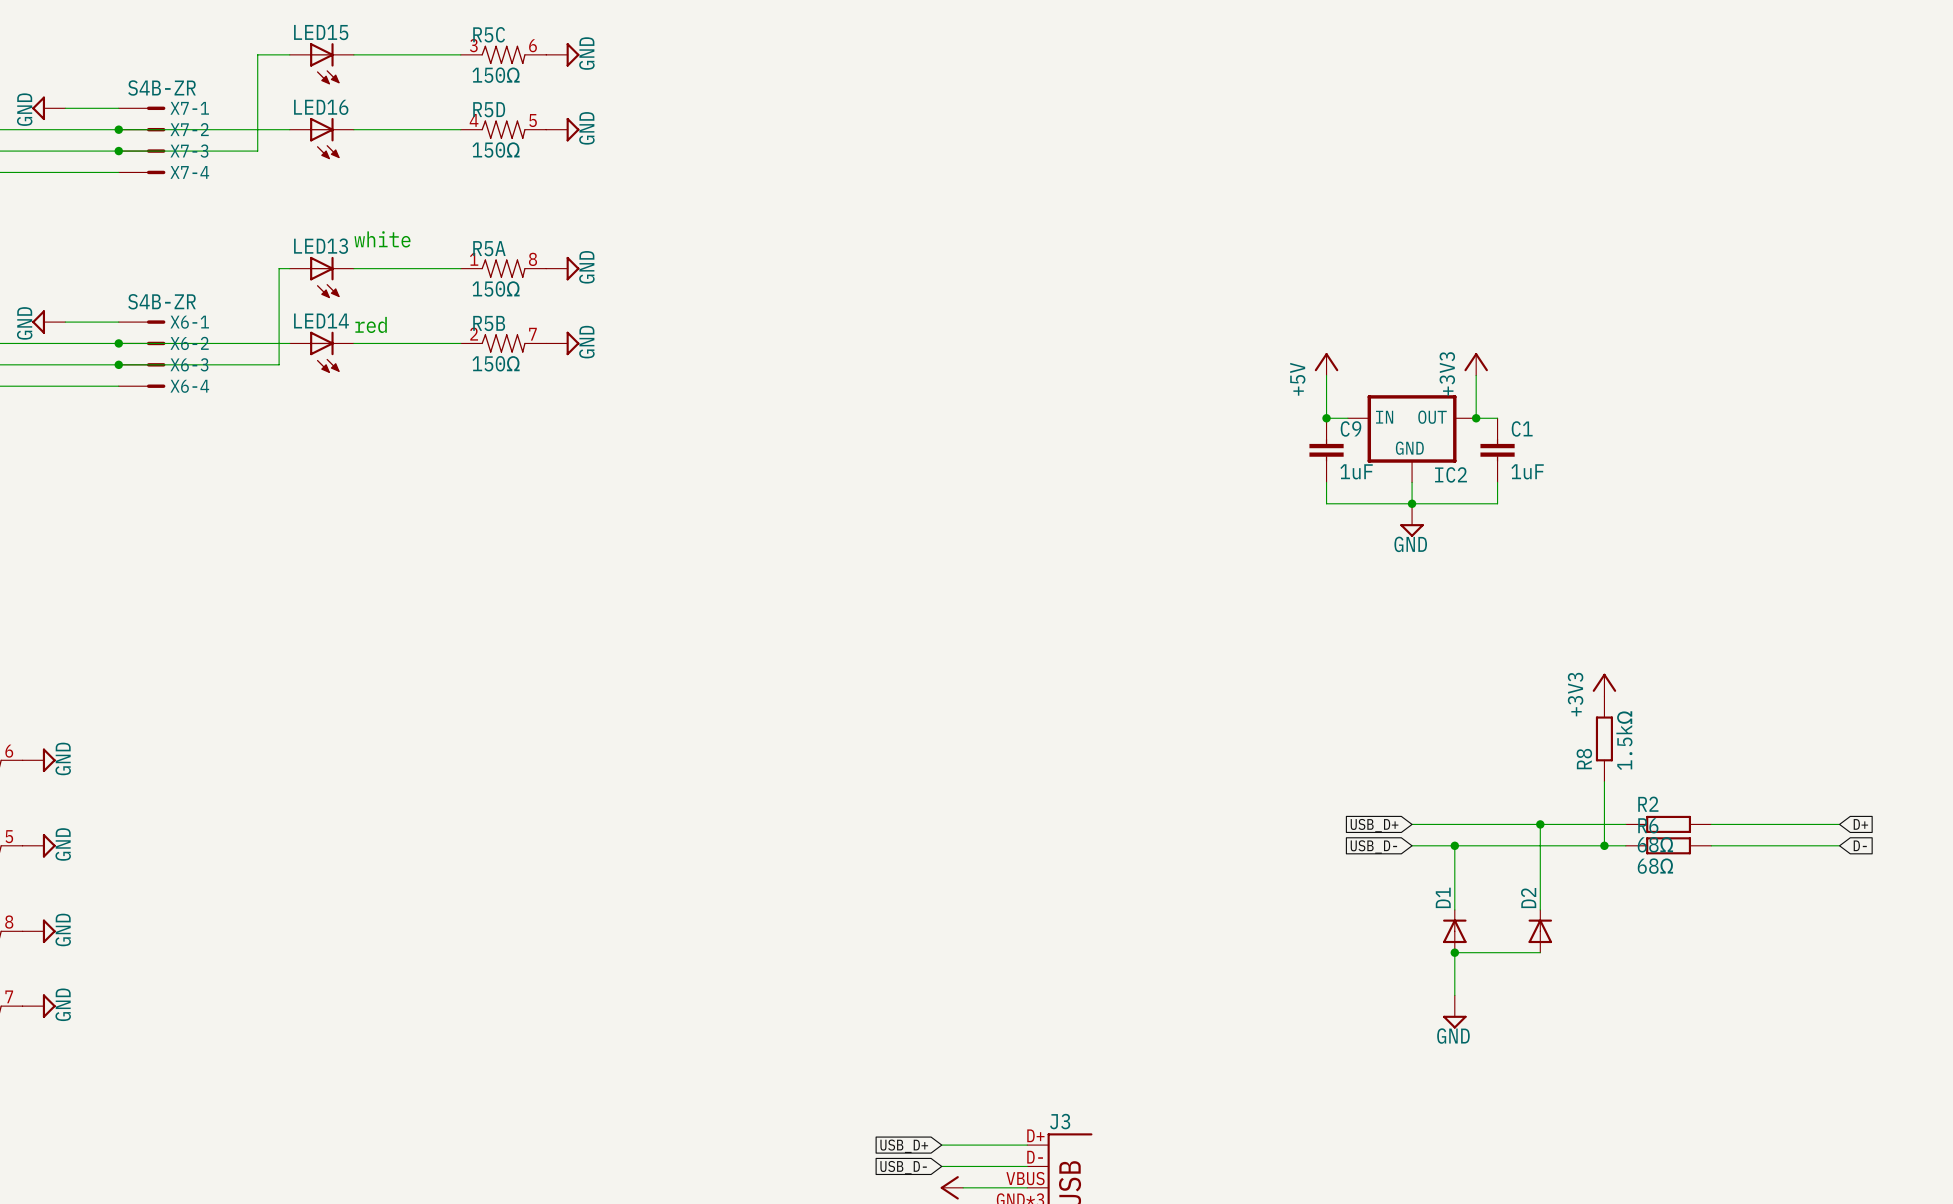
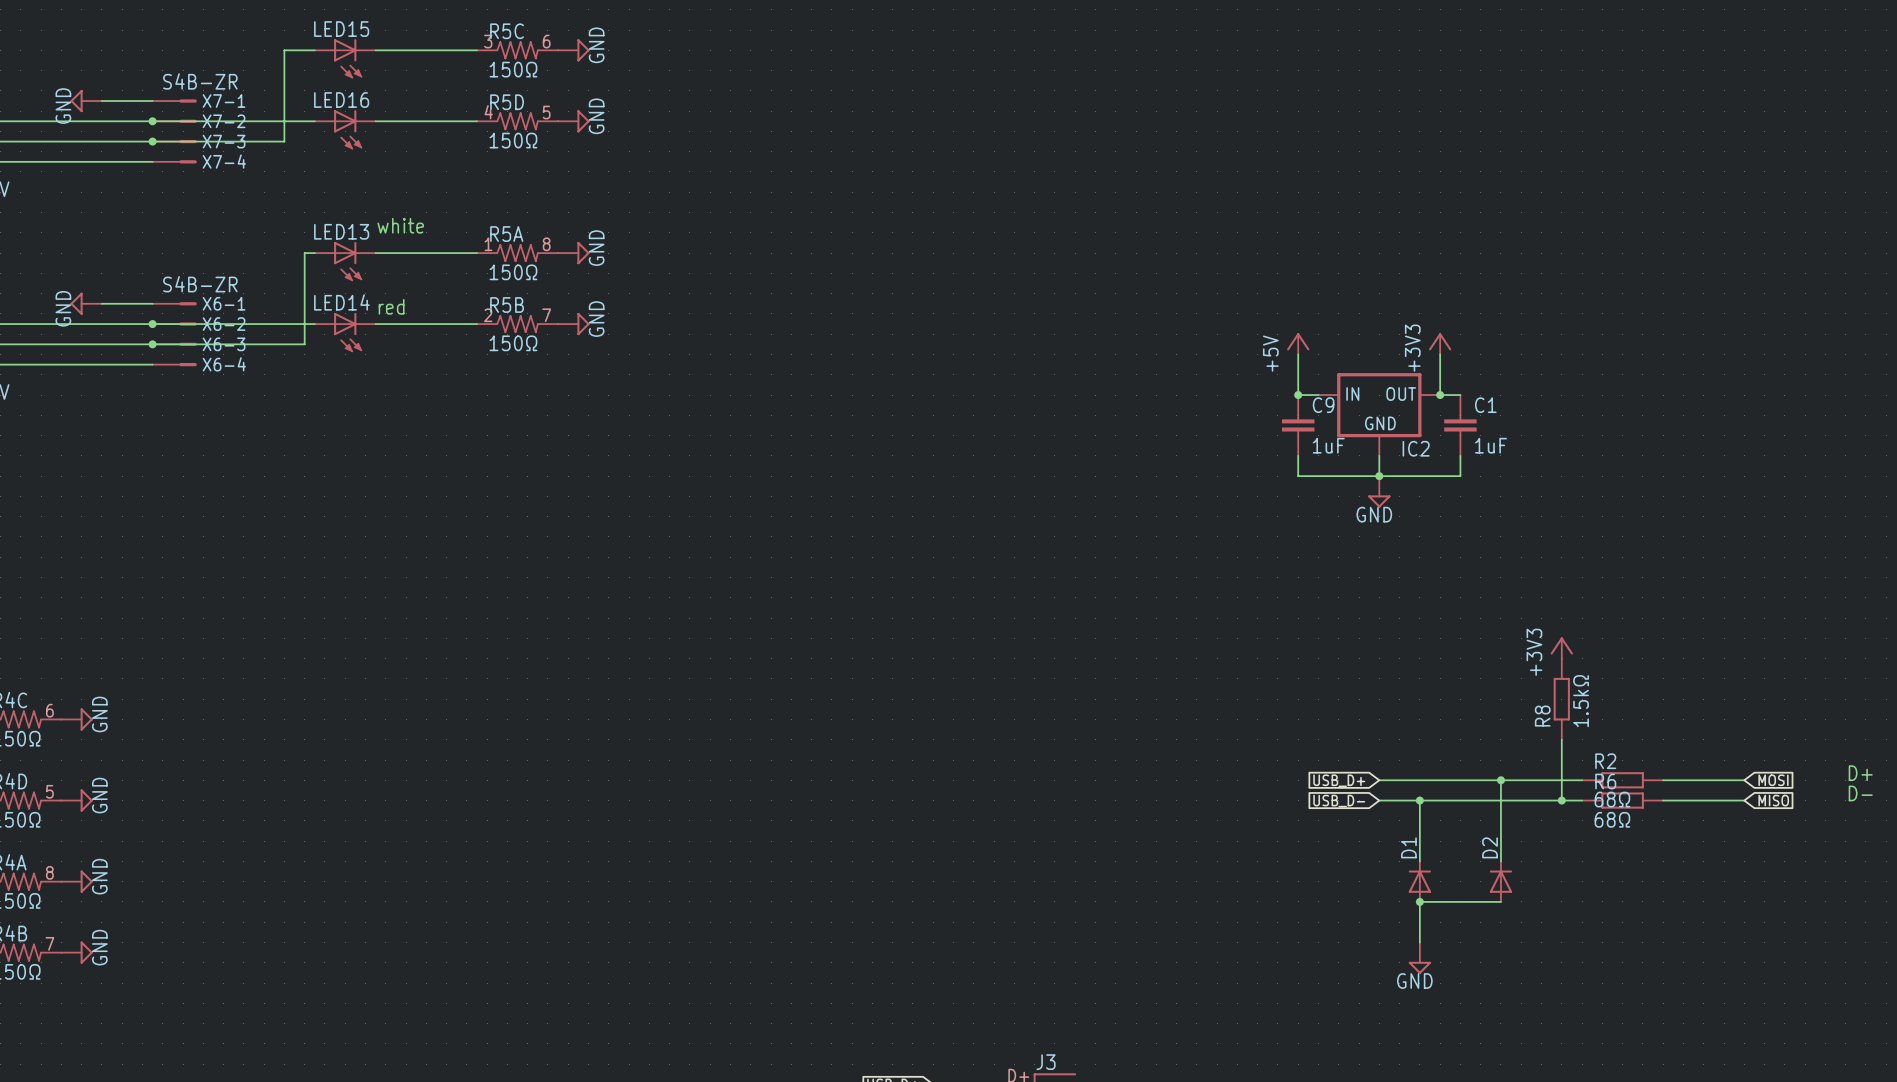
text: none -> D+ (1860, 773)
wire: (1796, 824) (1839, 824) -> none
global label: none -> MOSI (1773, 780)
global label: D+ (1860, 824) -> none
text: none -> D- (1860, 793)
wire: (1796, 845) (1839, 845) -> none
global label: none -> MISO (1773, 800)
global label: D- (1860, 845) -> none

